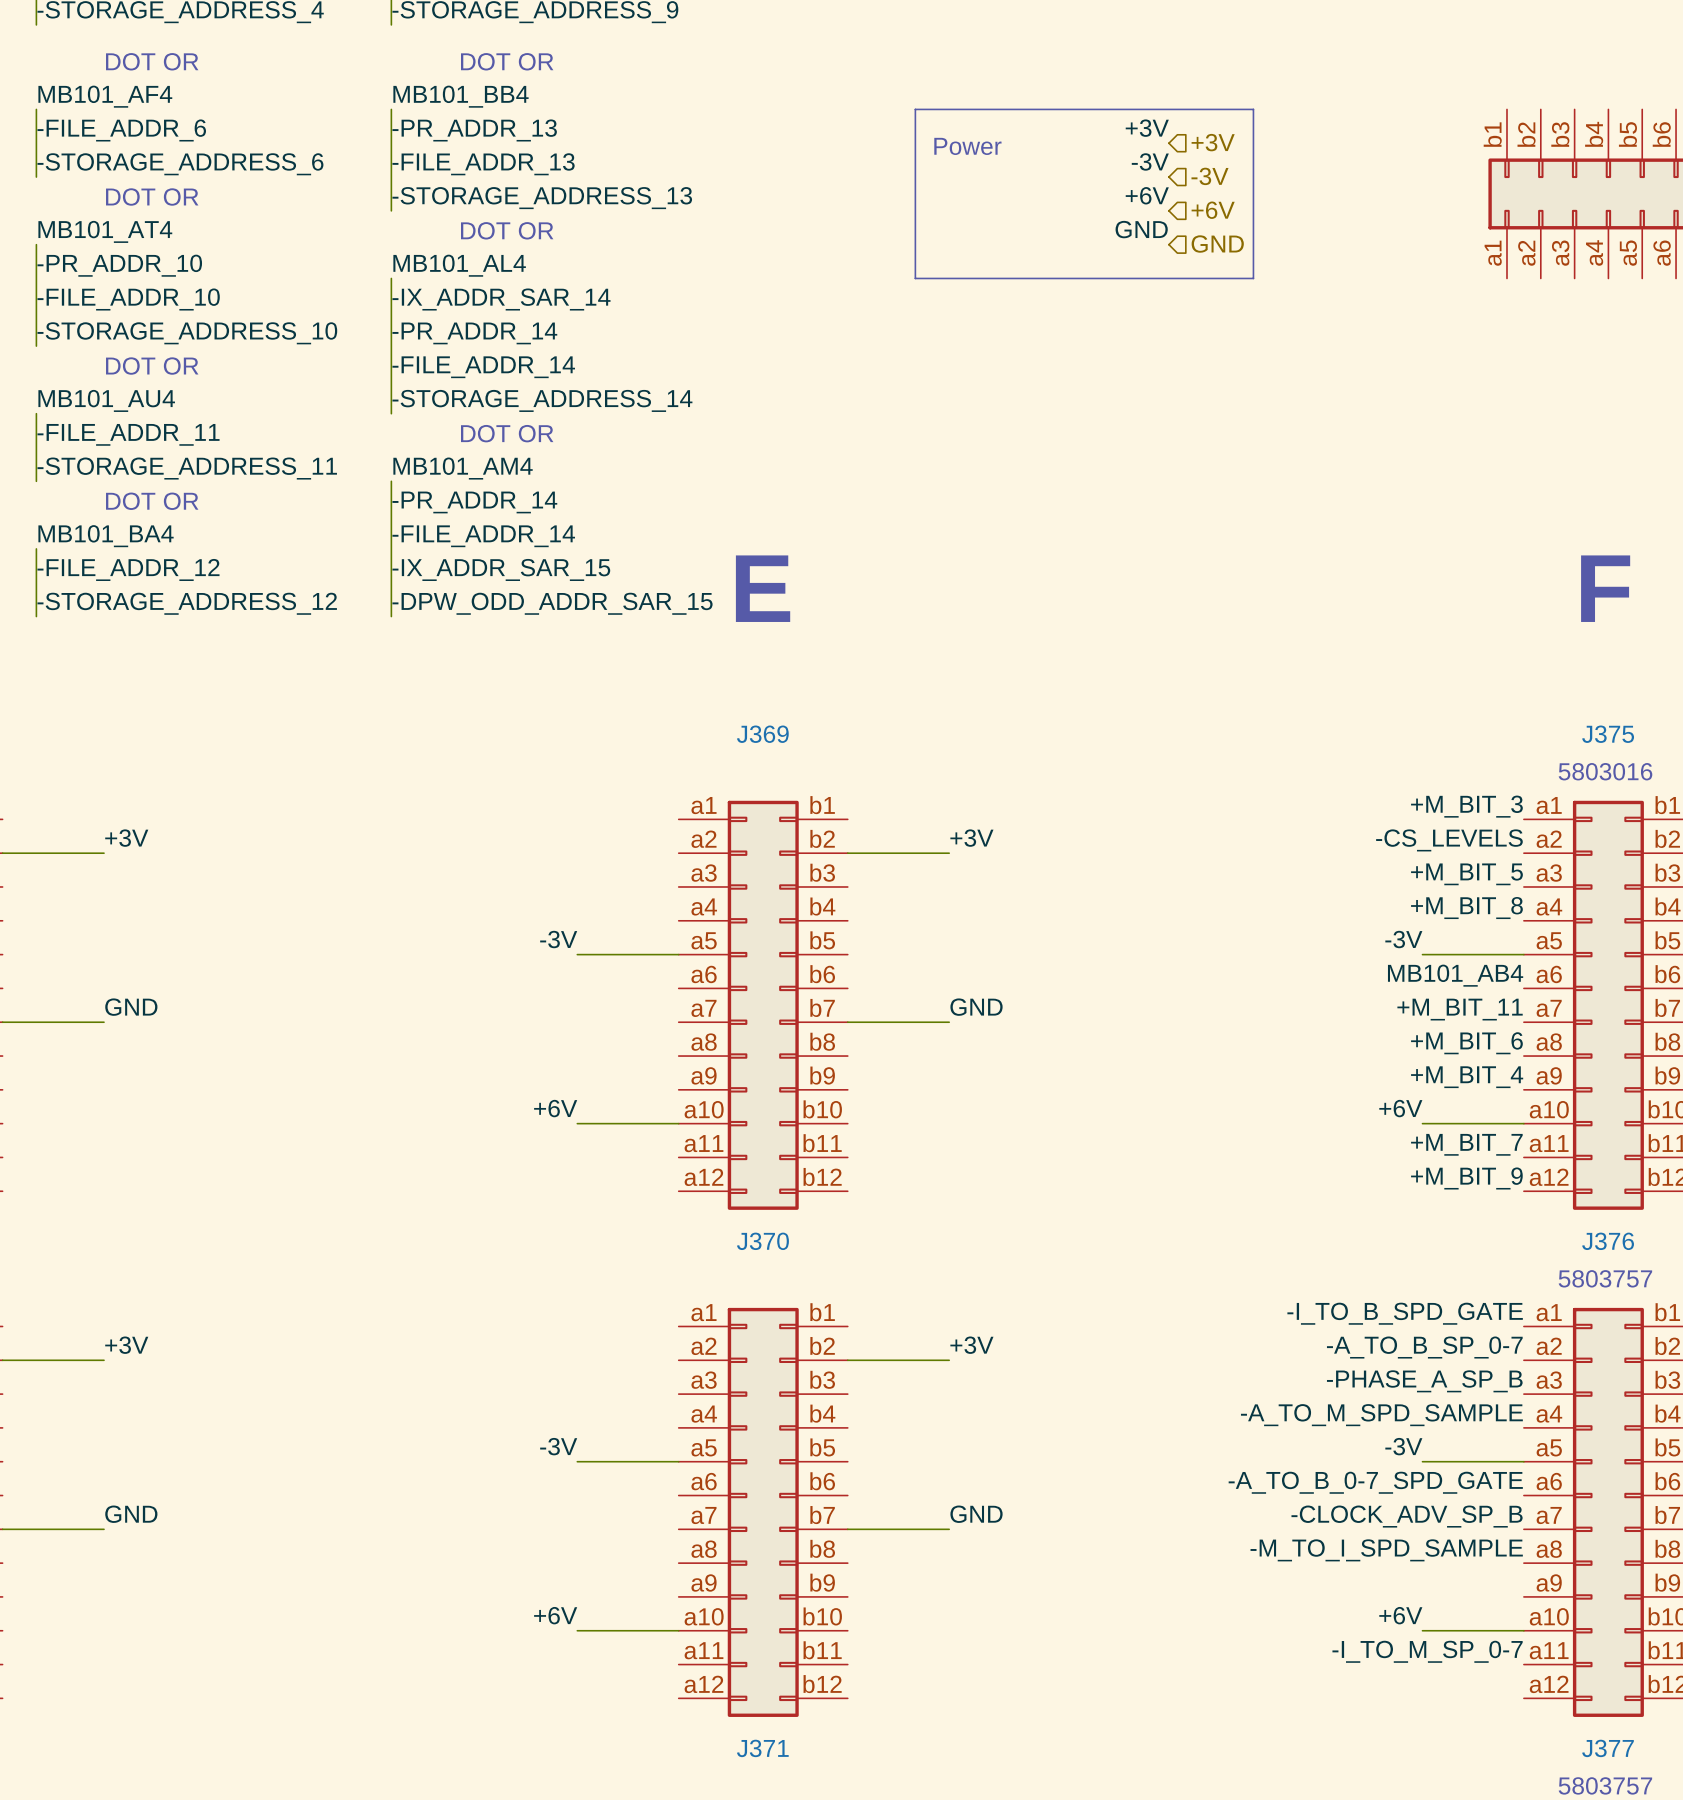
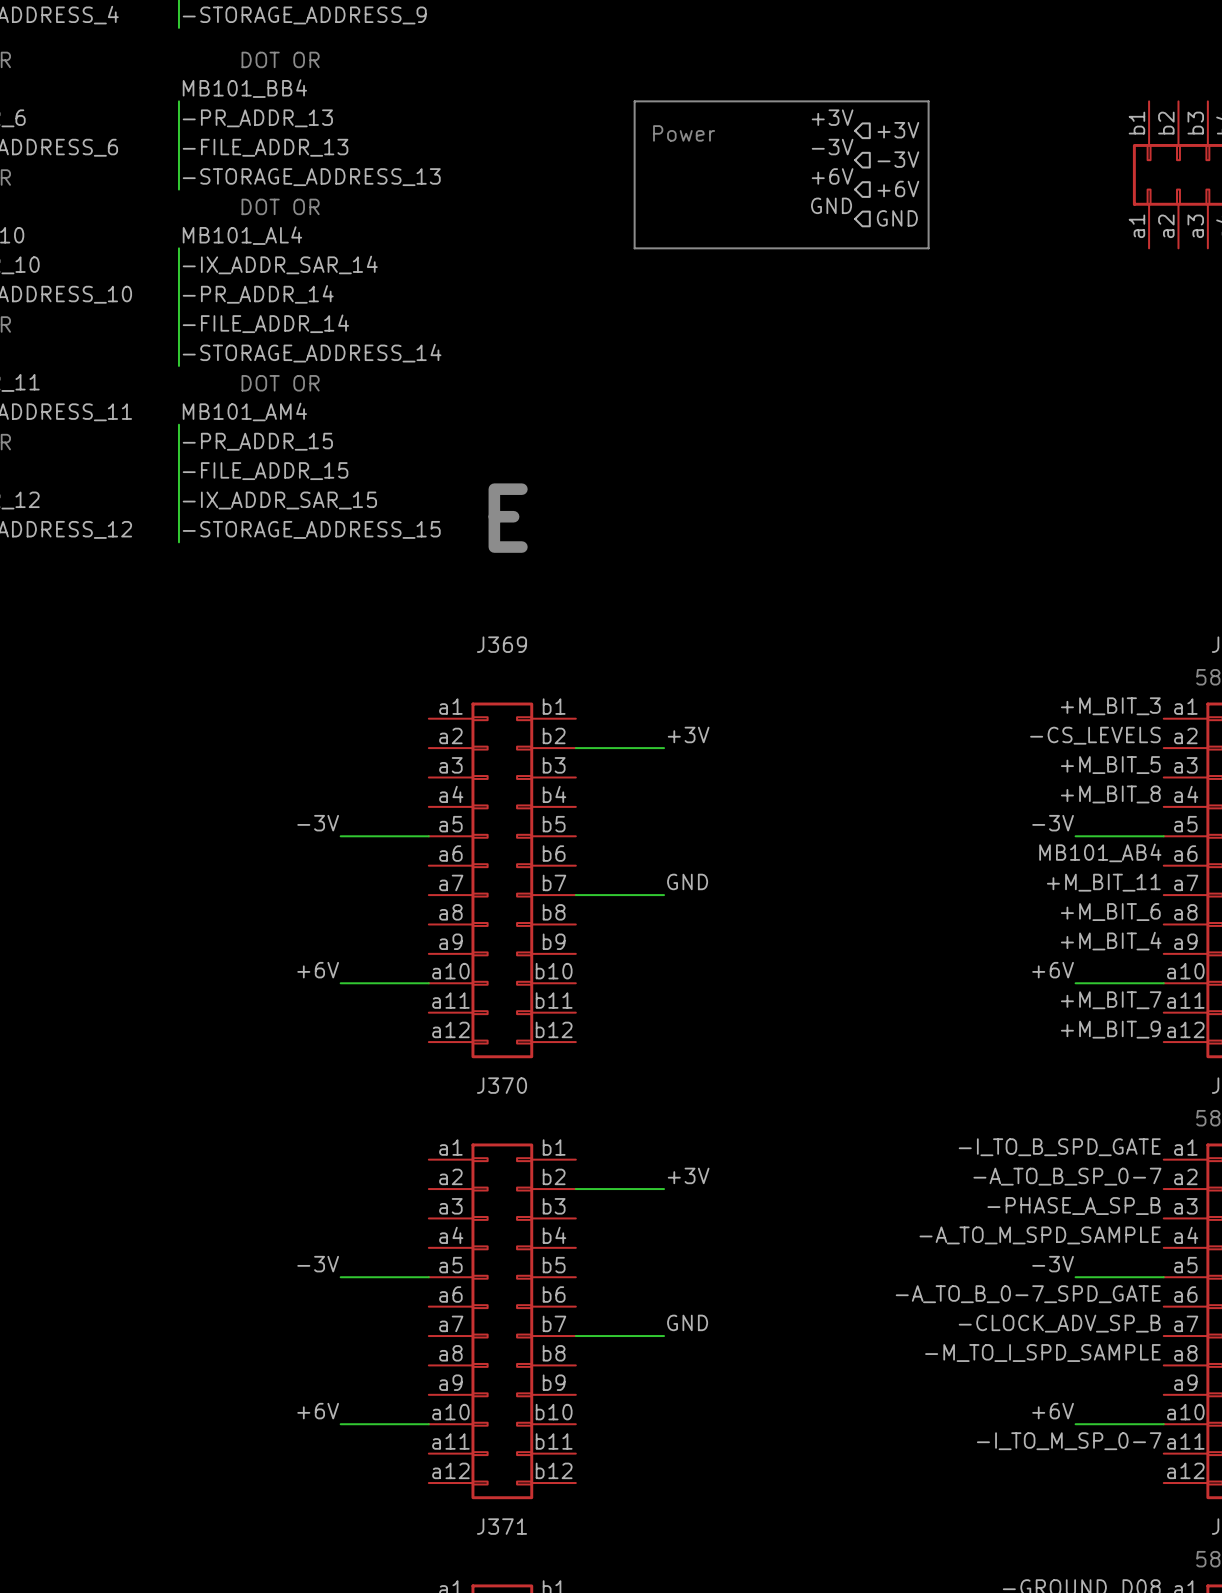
label: -PR_ADDR_14 (474, 502) -> -PR_ADDR_15 (257, 441)
label: -FILE_ADDR_14 (483, 536) -> -FILE_ADDR_15 (265, 471)
label: -DPW_ODD_ADDR_SAR_15 (552, 603) -> -STORAGE_ADDRESS_15 (311, 529)

